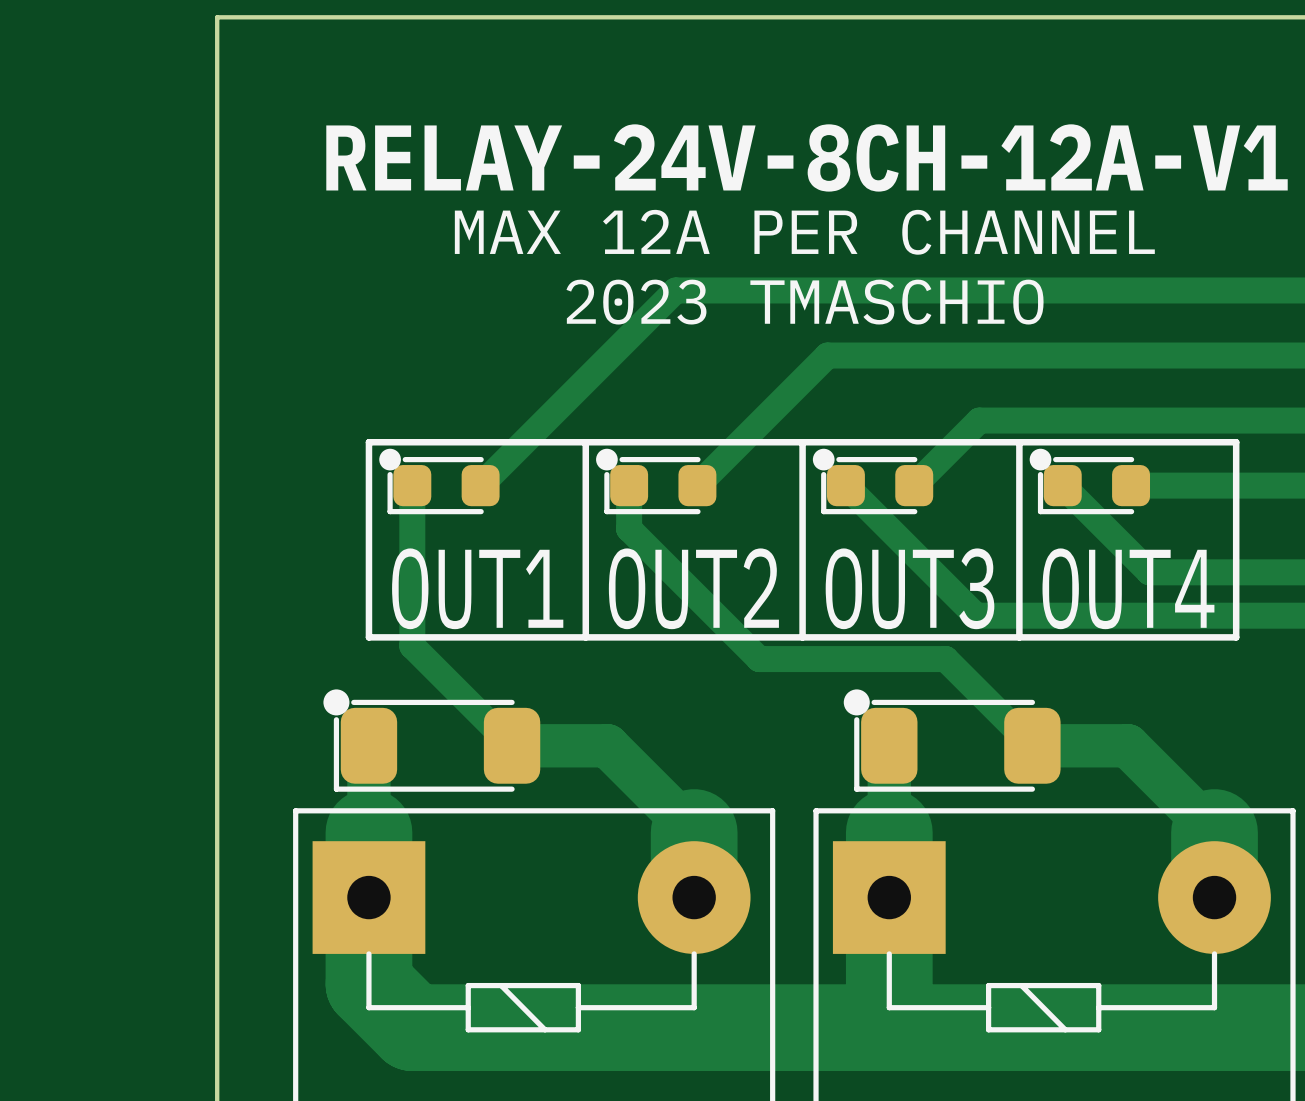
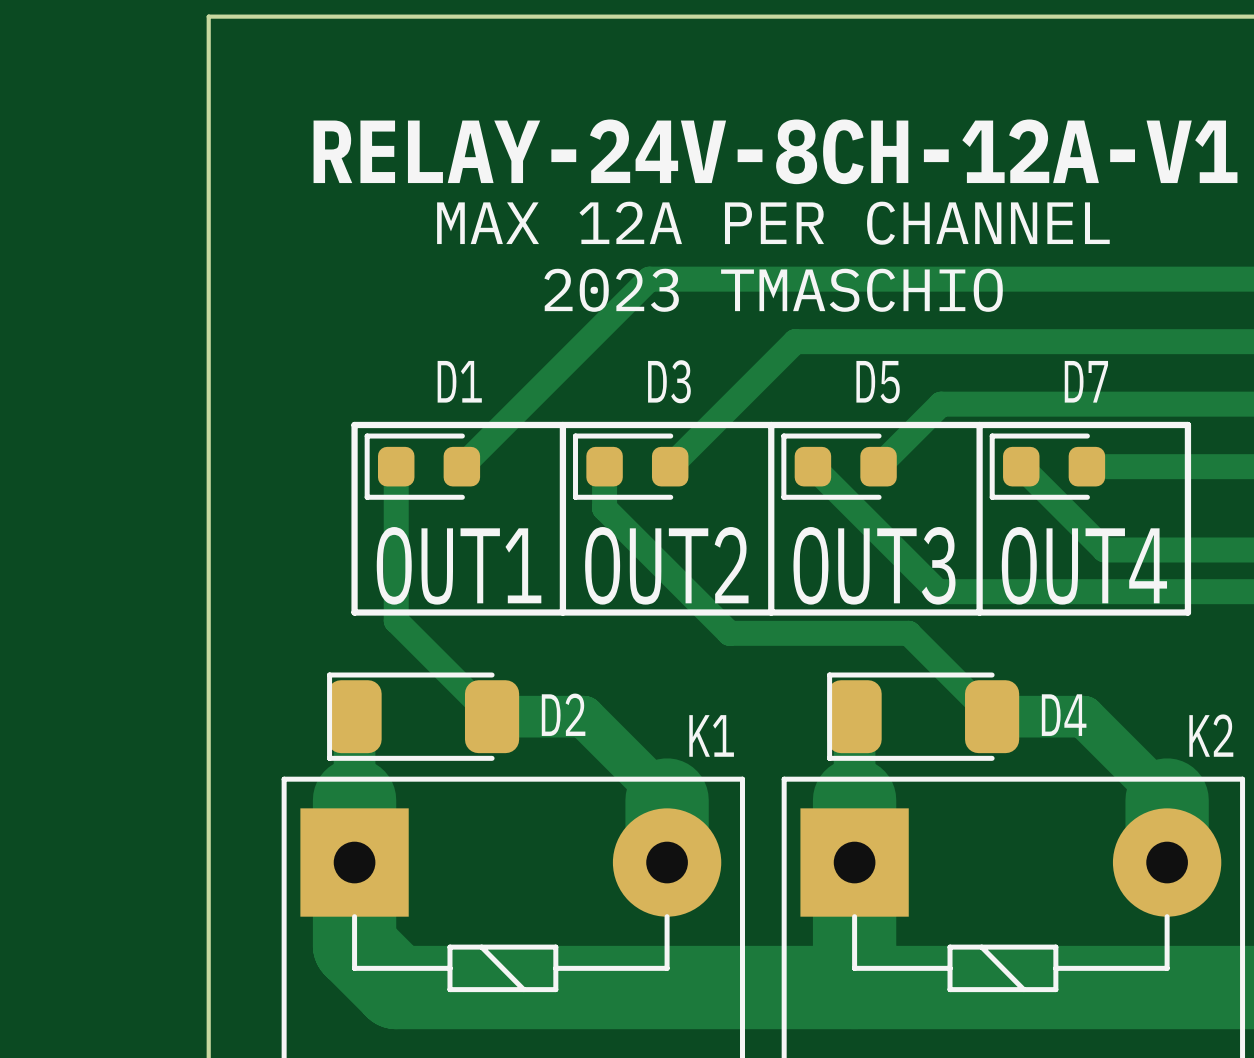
part: (439, 481) -> none
part: (656, 481) -> none
part: (873, 481) -> none
part: (1089, 481) -> none
D1: none -> (422, 466)
D3: none -> (630, 466)
D5: none -> (839, 466)
D7: none -> (1047, 466)
part: (431, 740) -> none
part: (952, 740) -> none
D2: none -> (423, 716)
D4: none -> (923, 716)
K1 name: none -> K1 (711, 735)
K2 name: none -> K2 (1211, 735)

